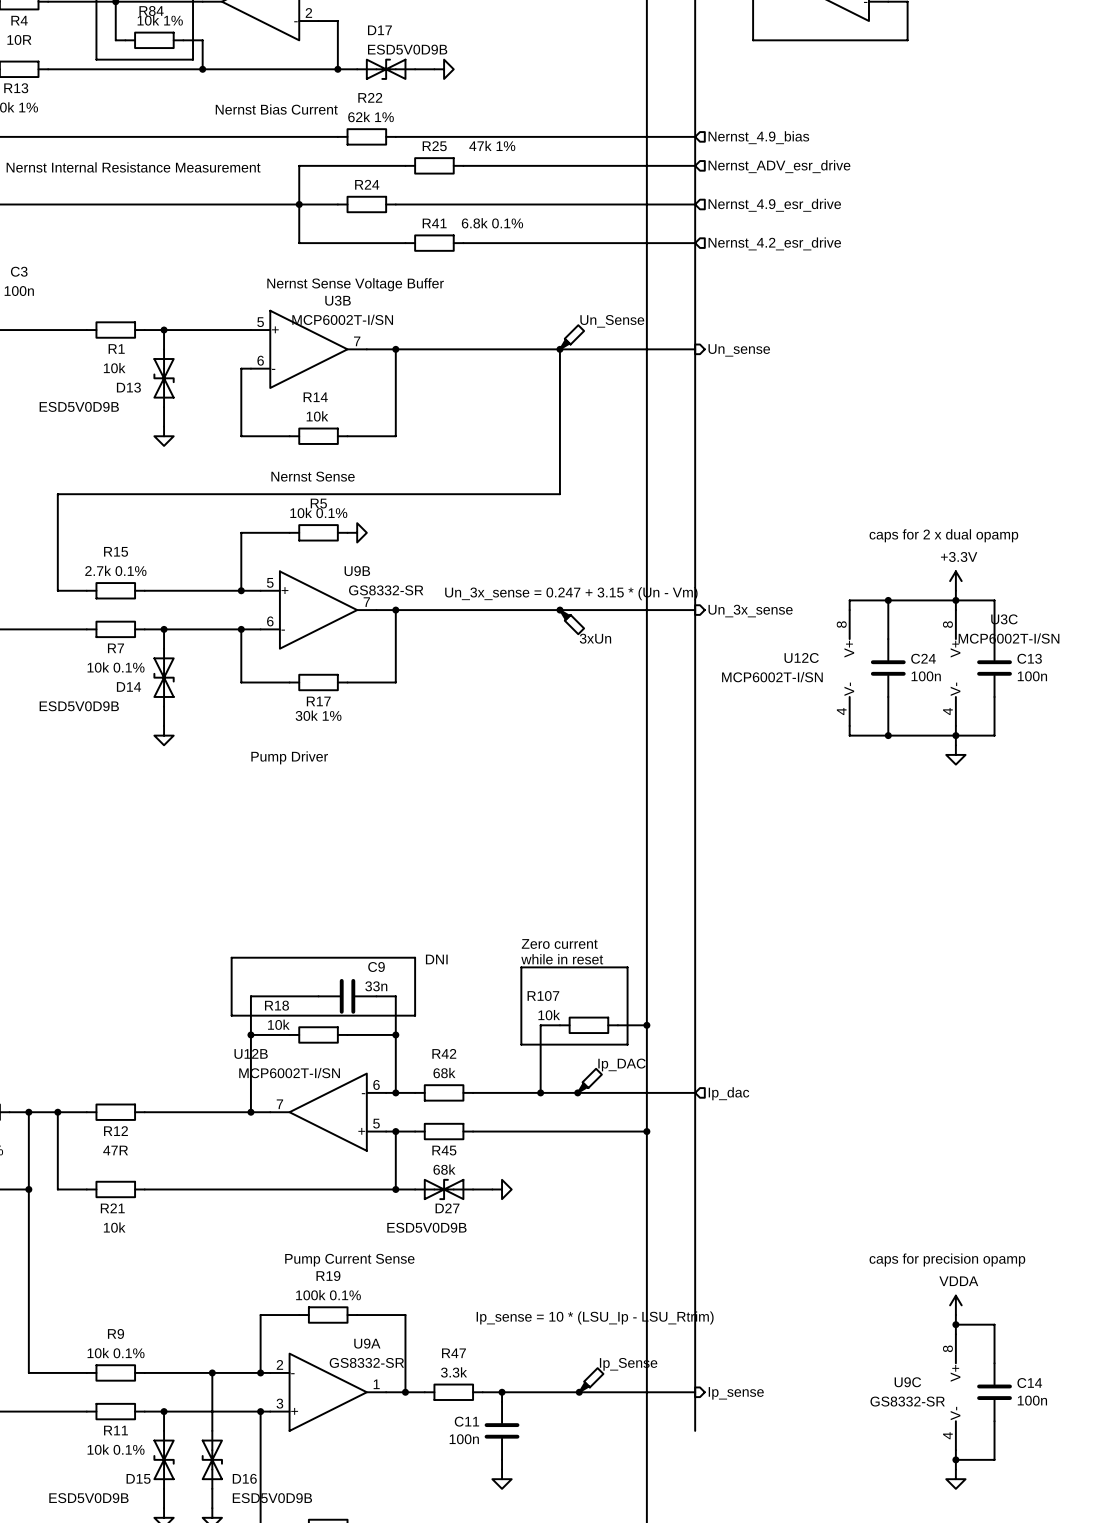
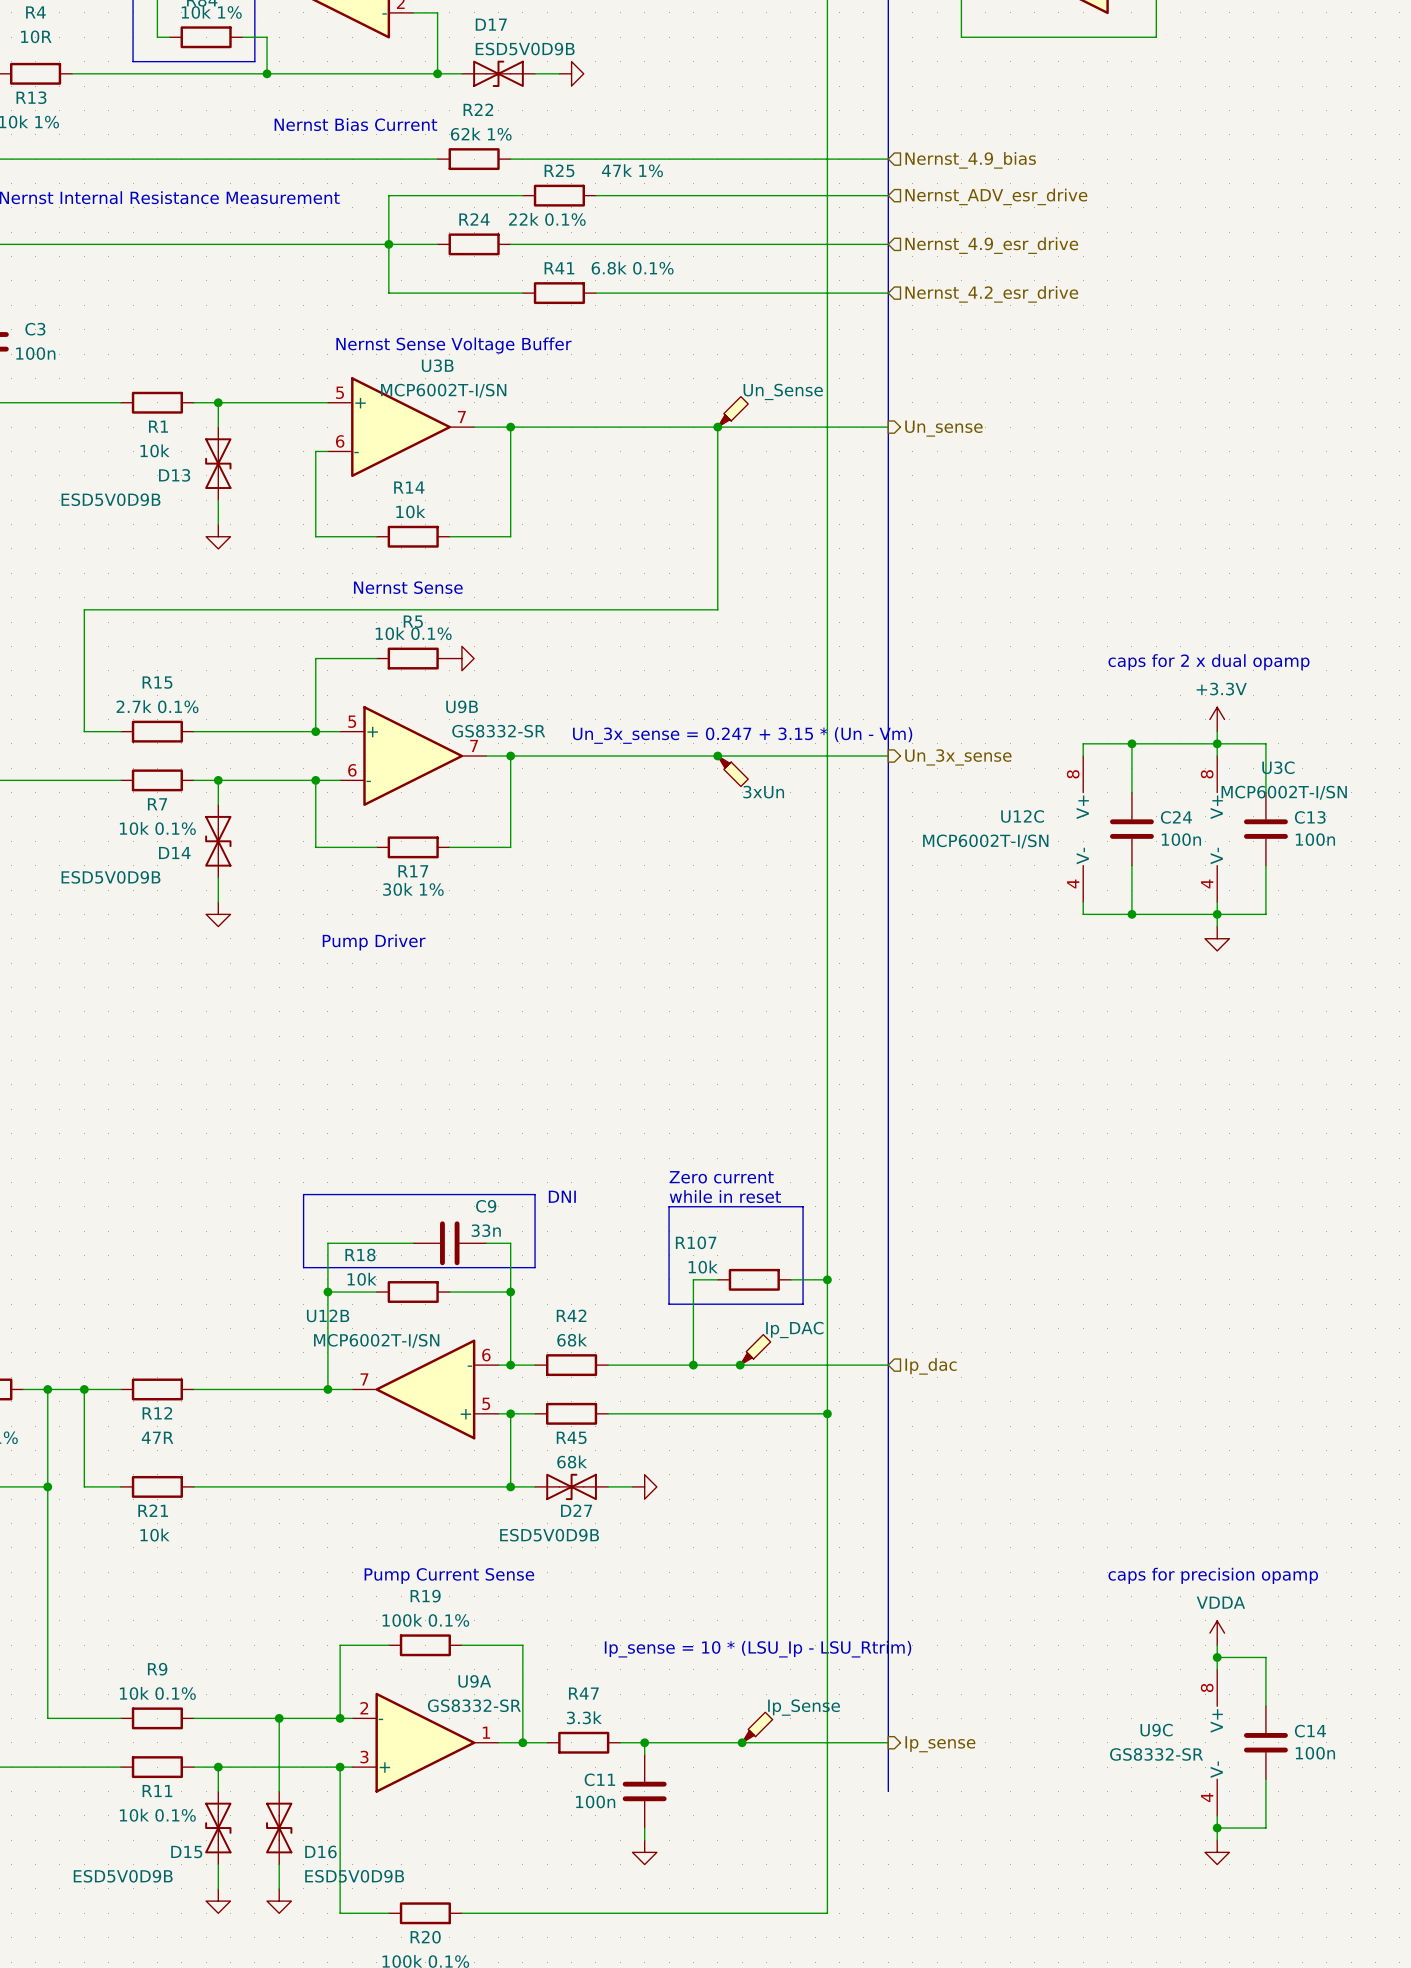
R24 value: none -> 22k 0.1% (547, 219)

